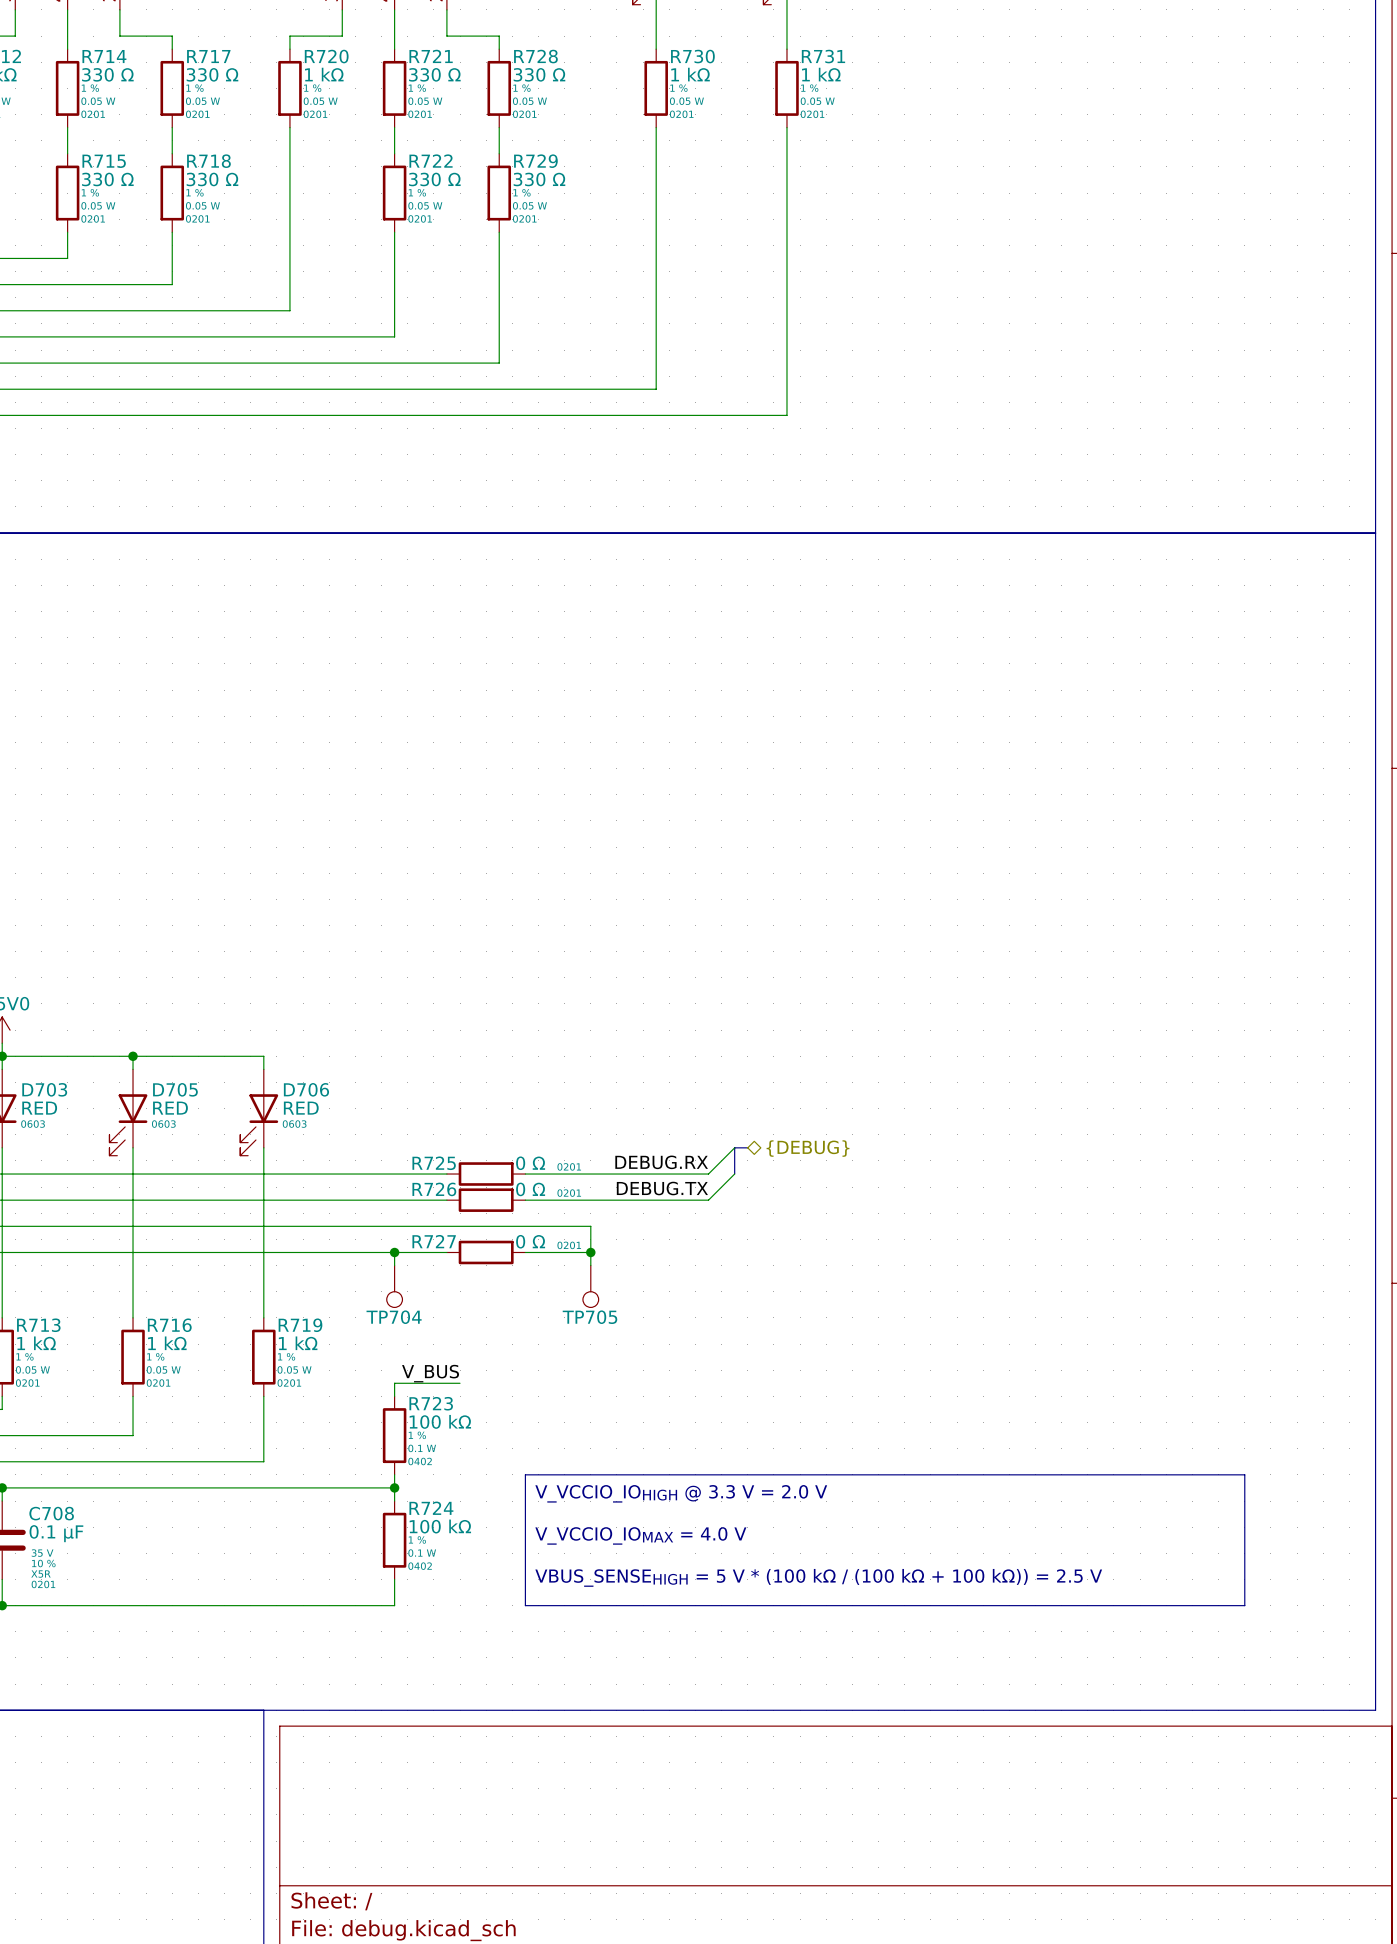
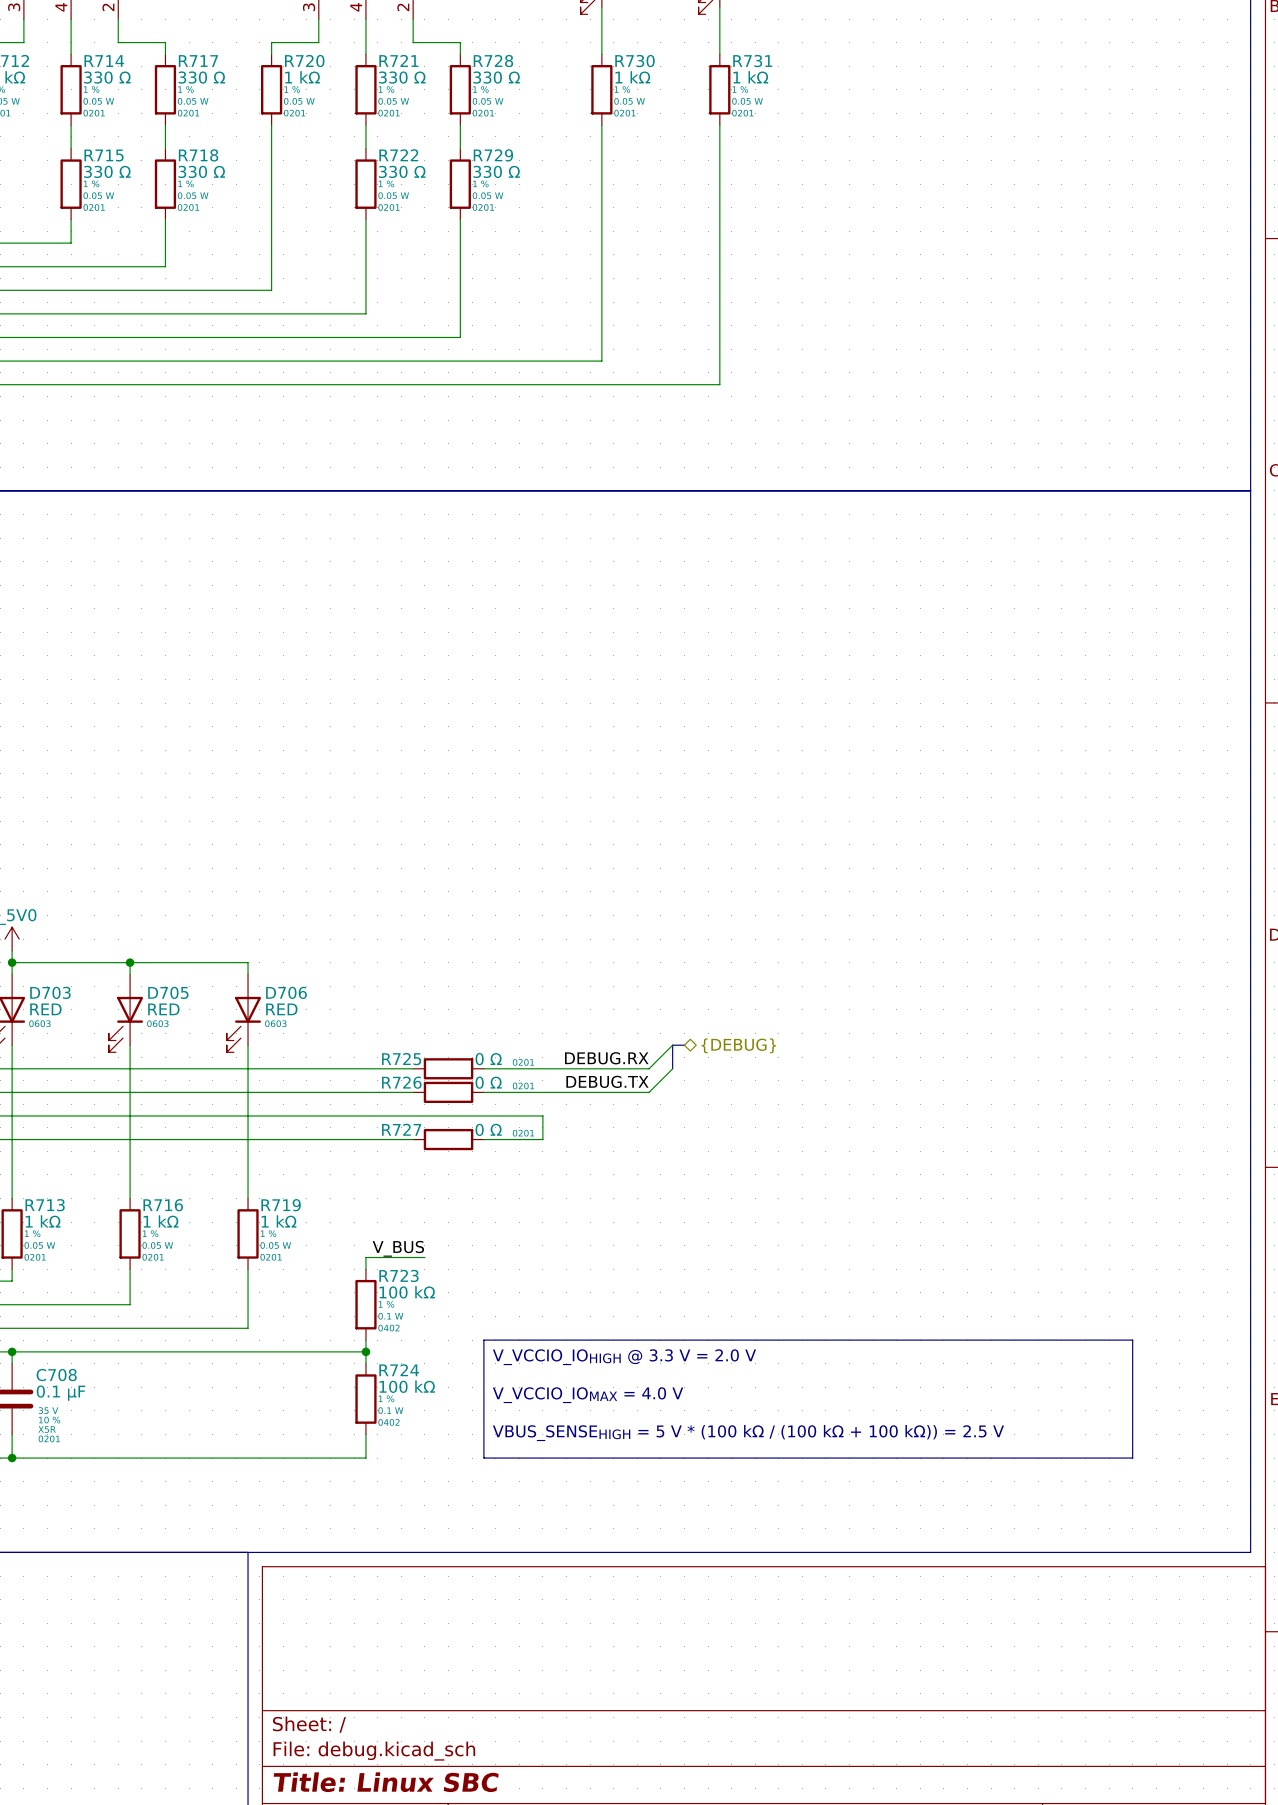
wire: (394, 1252) (394, 1265) -> none
junction: (394, 1252) -> none
wire: (590, 1252) (590, 1265) -> none
junction: (590, 1252) -> none
TP704: (394, 1286) -> none
TP705: (590, 1286) -> none

